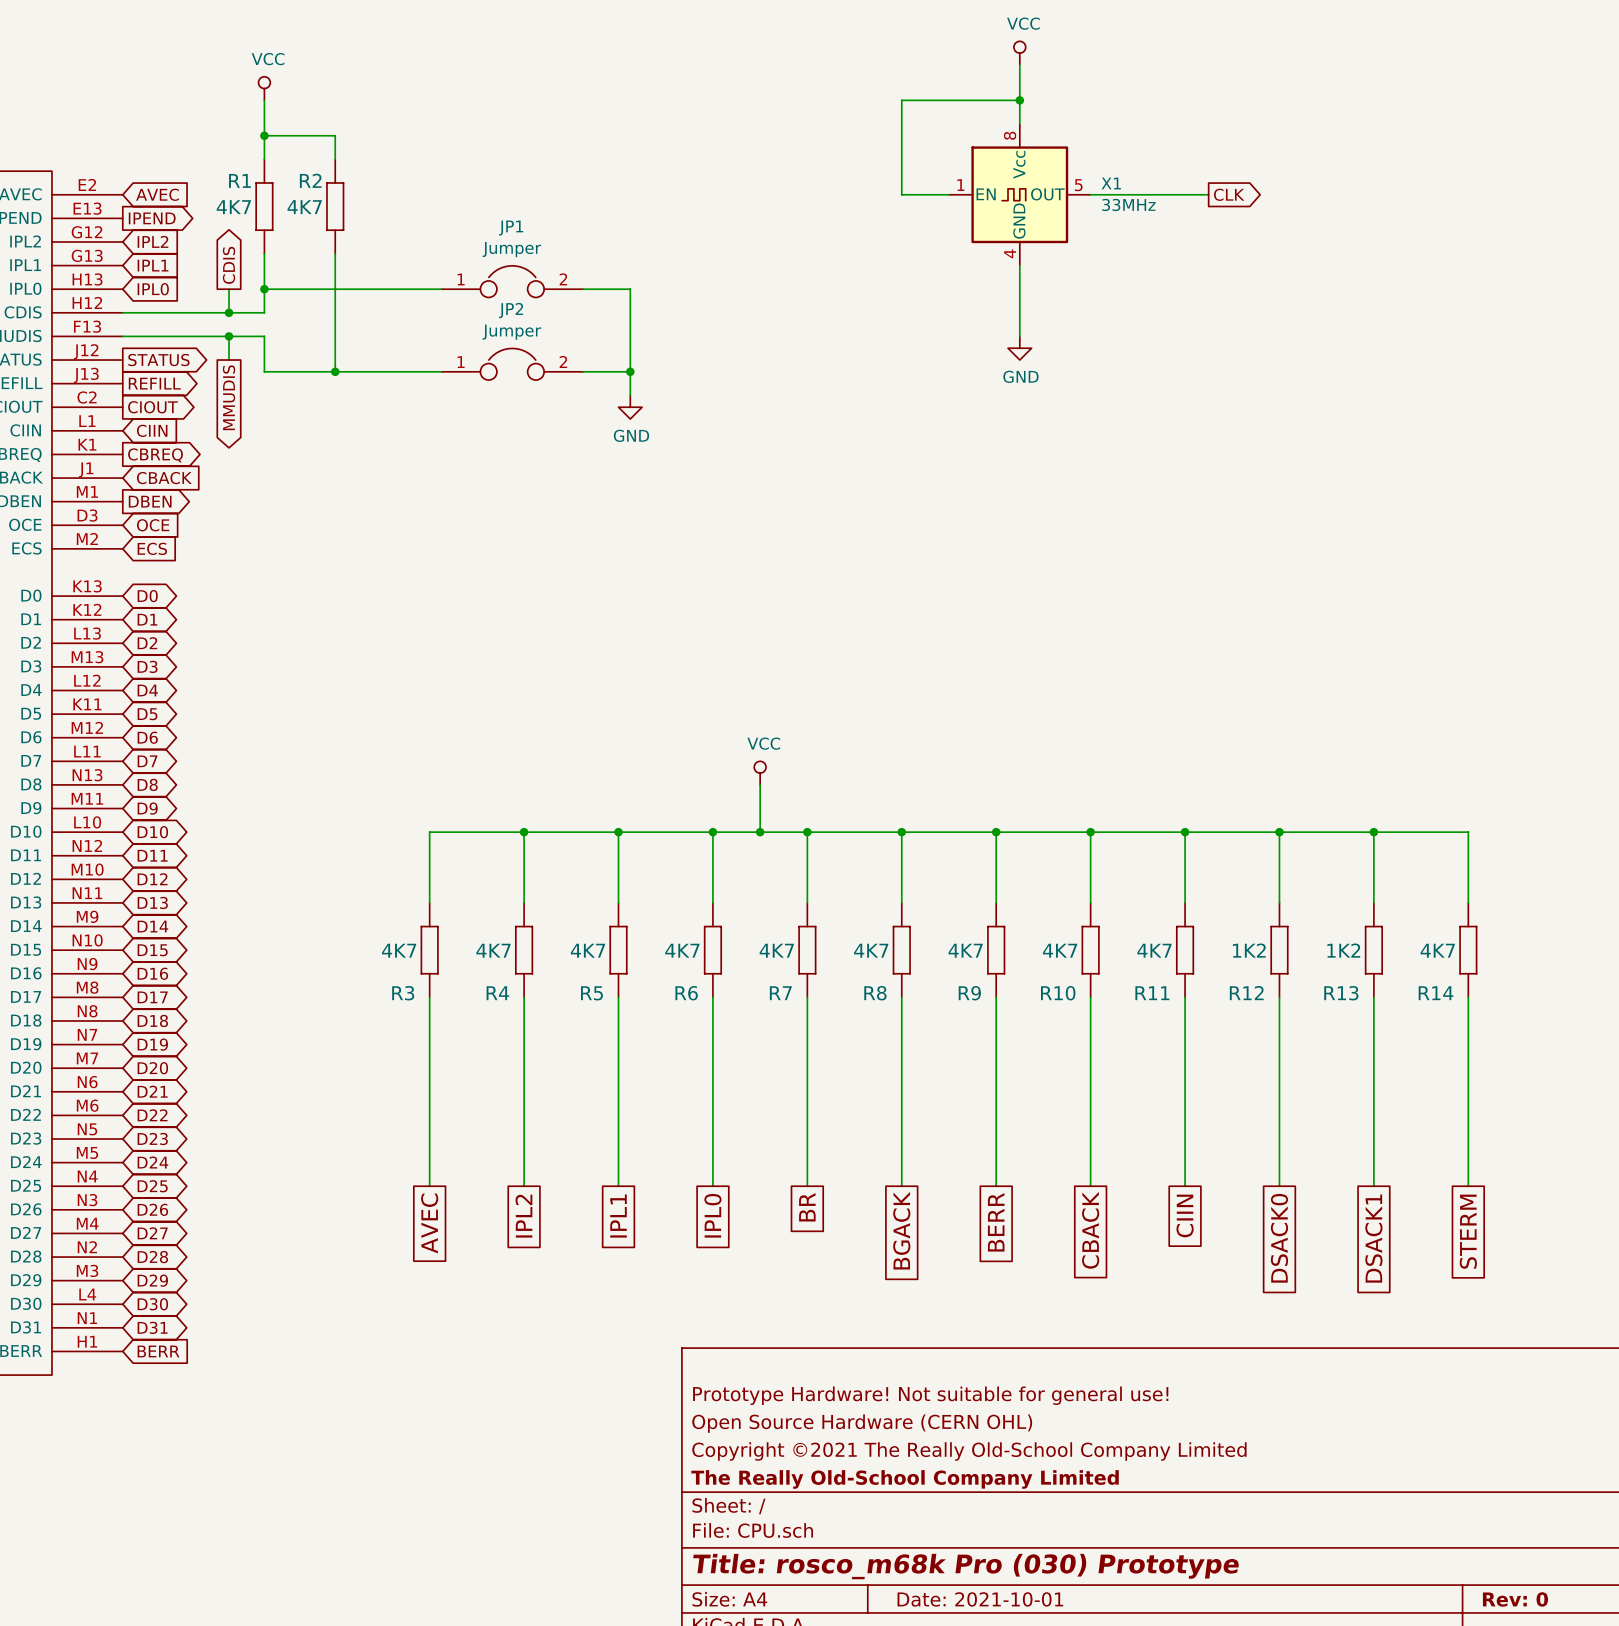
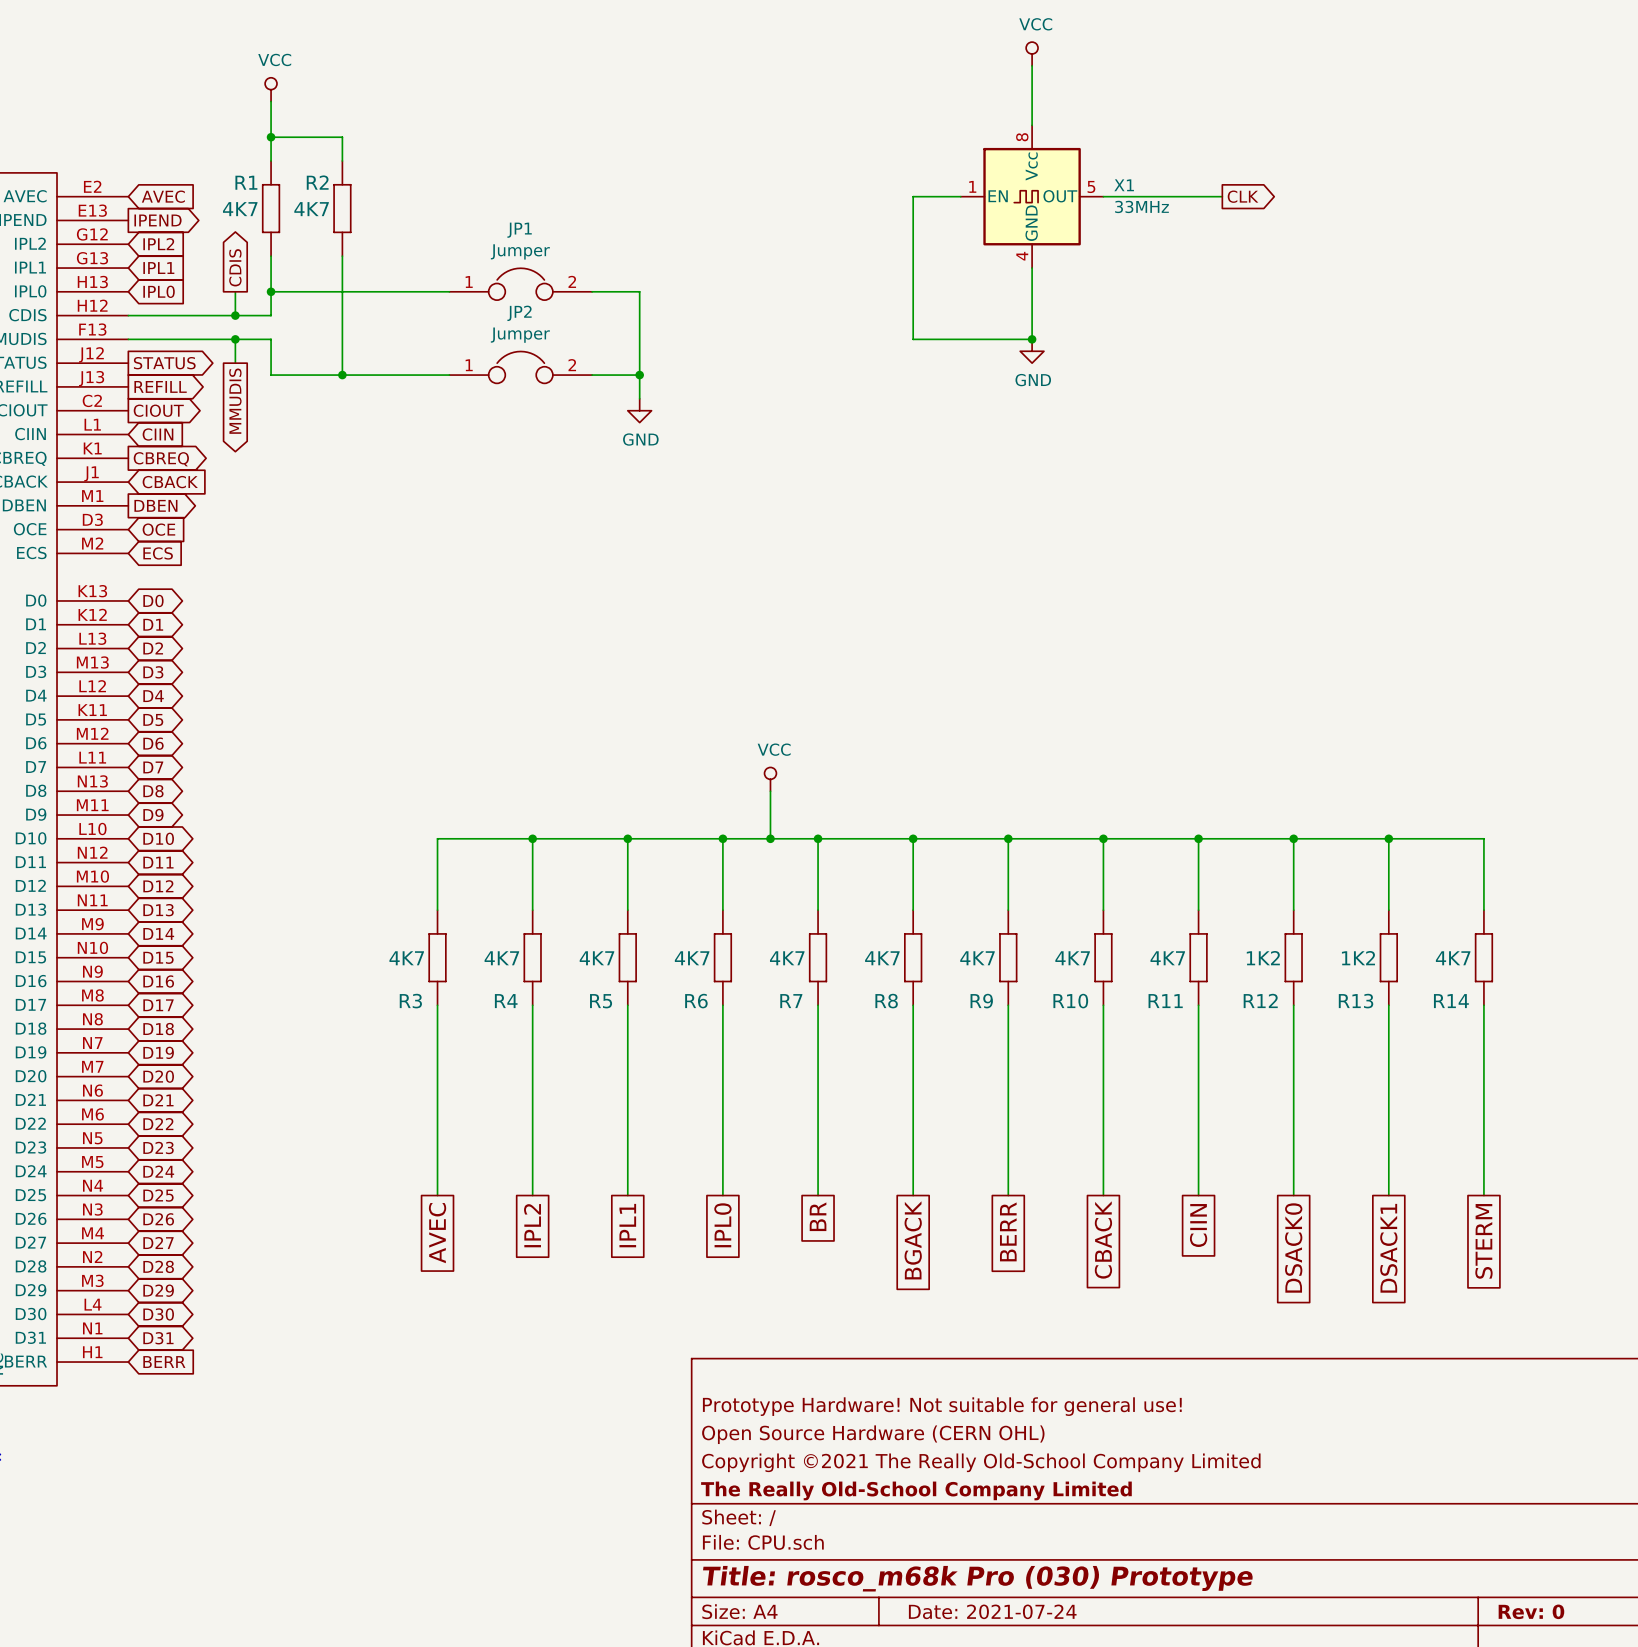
wire: (1019, 100) (901, 100) (901, 194) -> (1032, 339) (913, 339) (913, 196)
junction: (1019, 100) -> none
junction: none -> (1032, 339)
title block: Date: 2021-10-01 (980, 1599) -> Date: 2021-07-24 (992, 1611)

